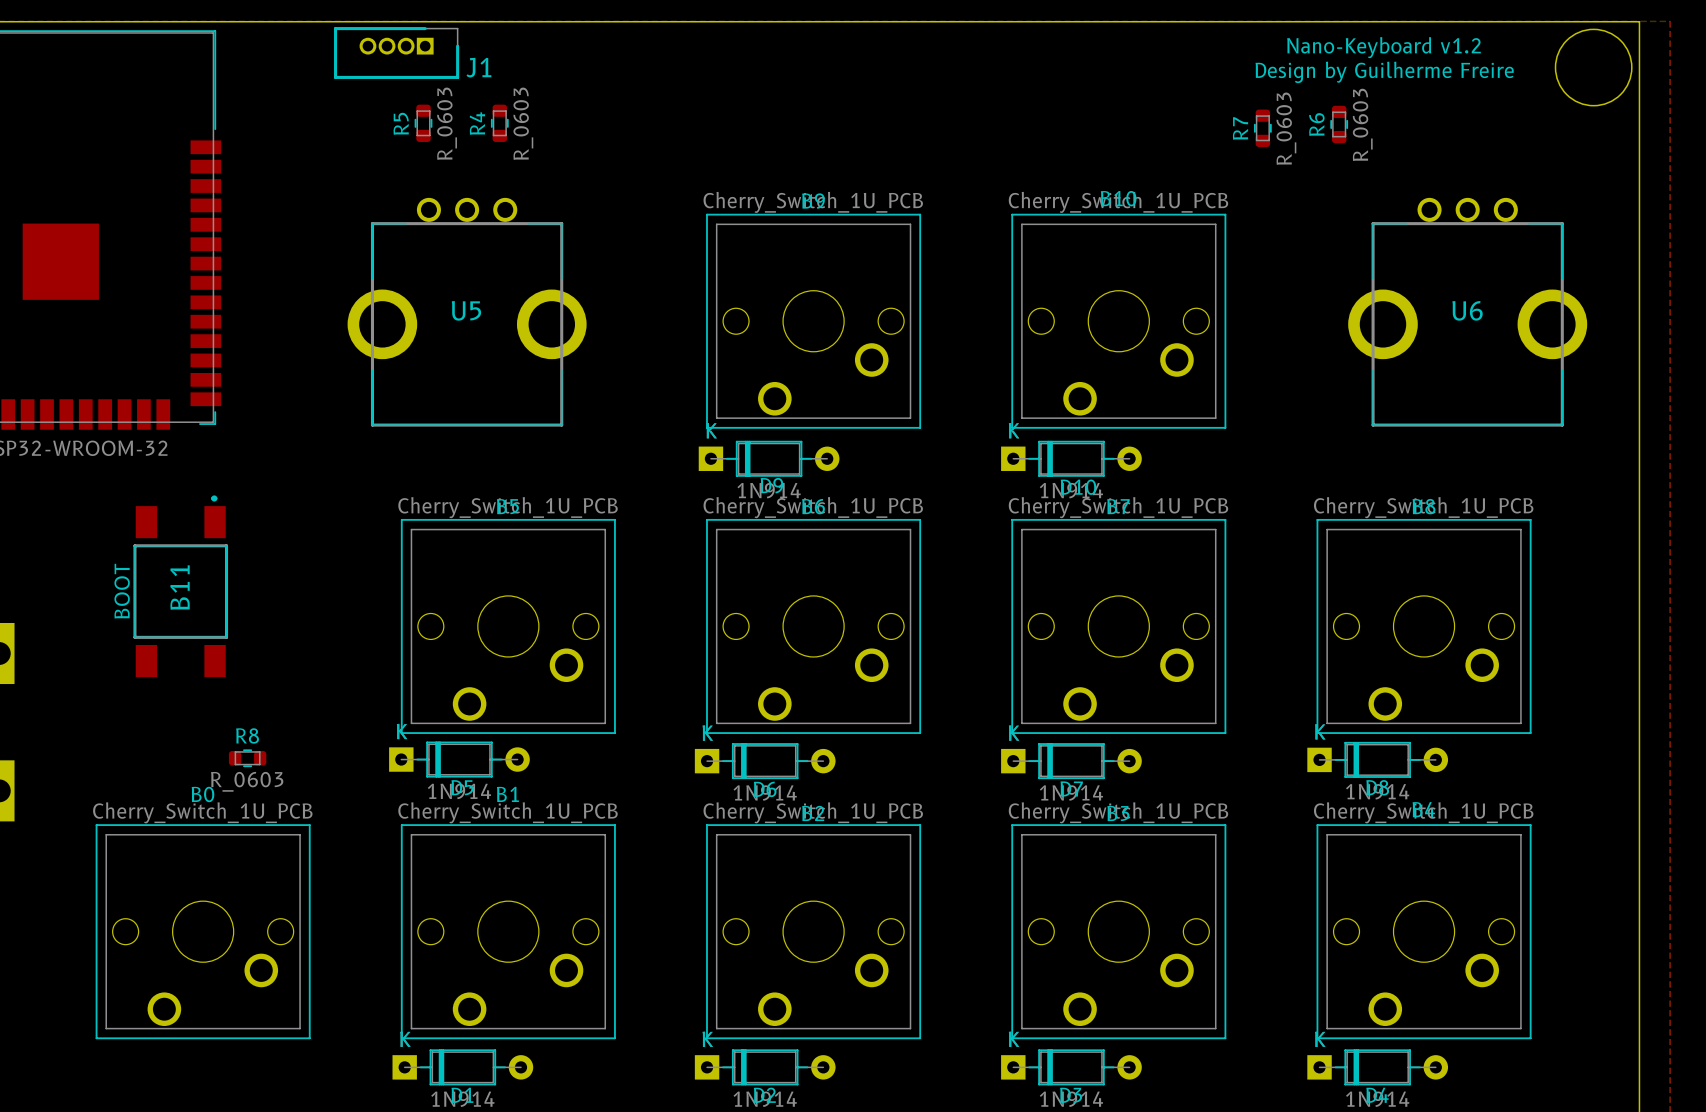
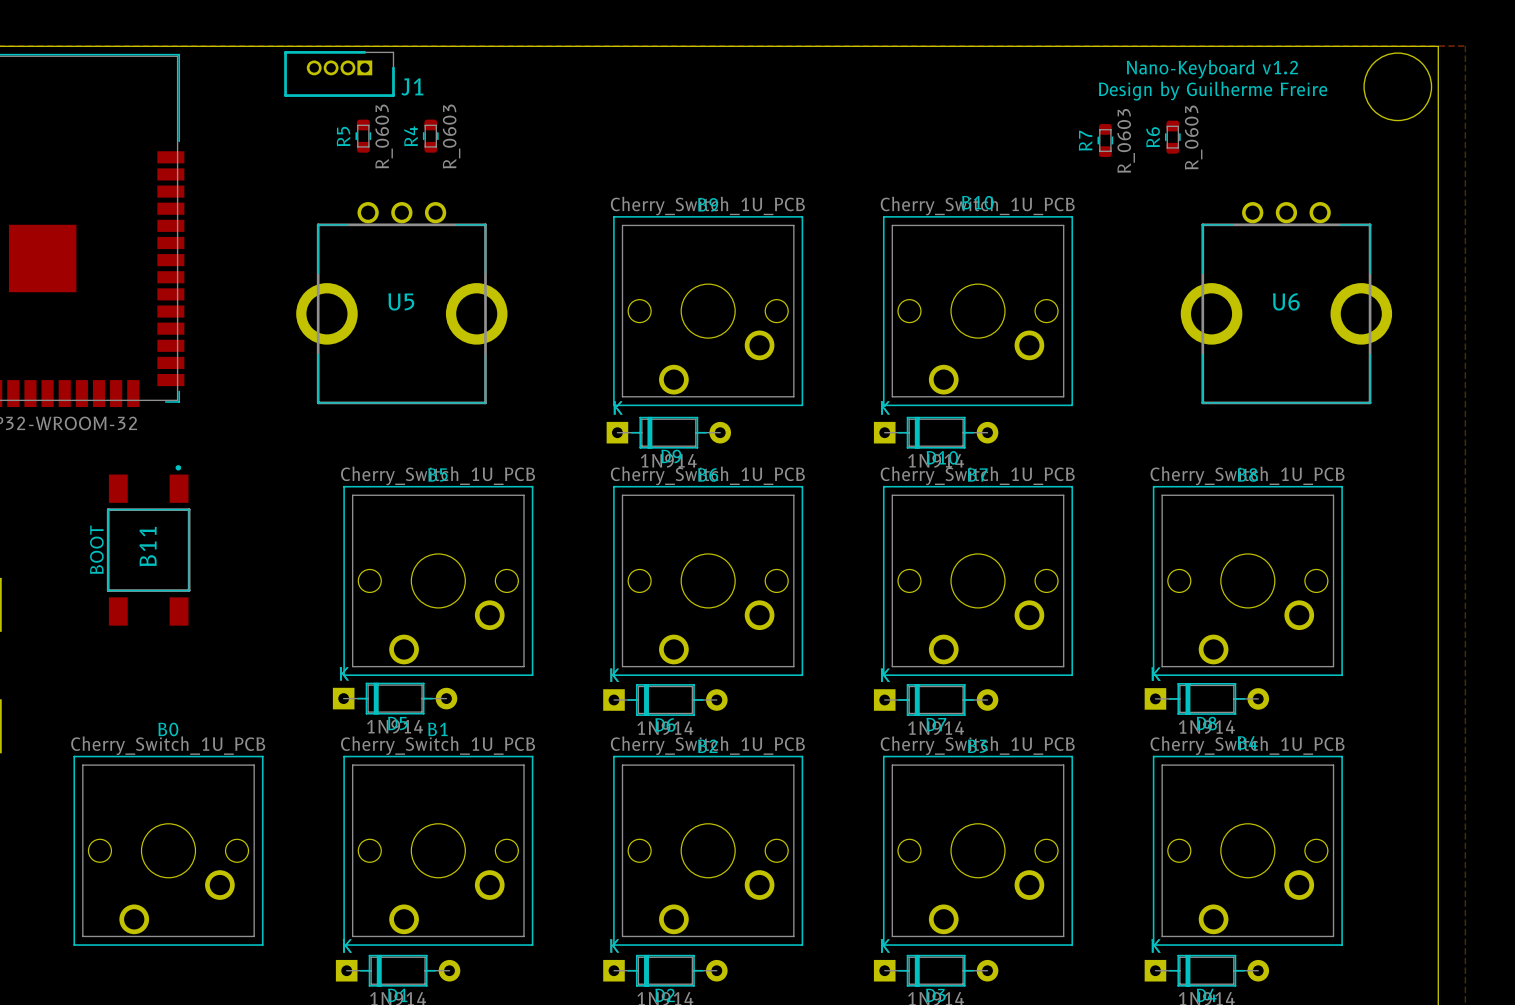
R8: R_0603 (247, 758) -> none

